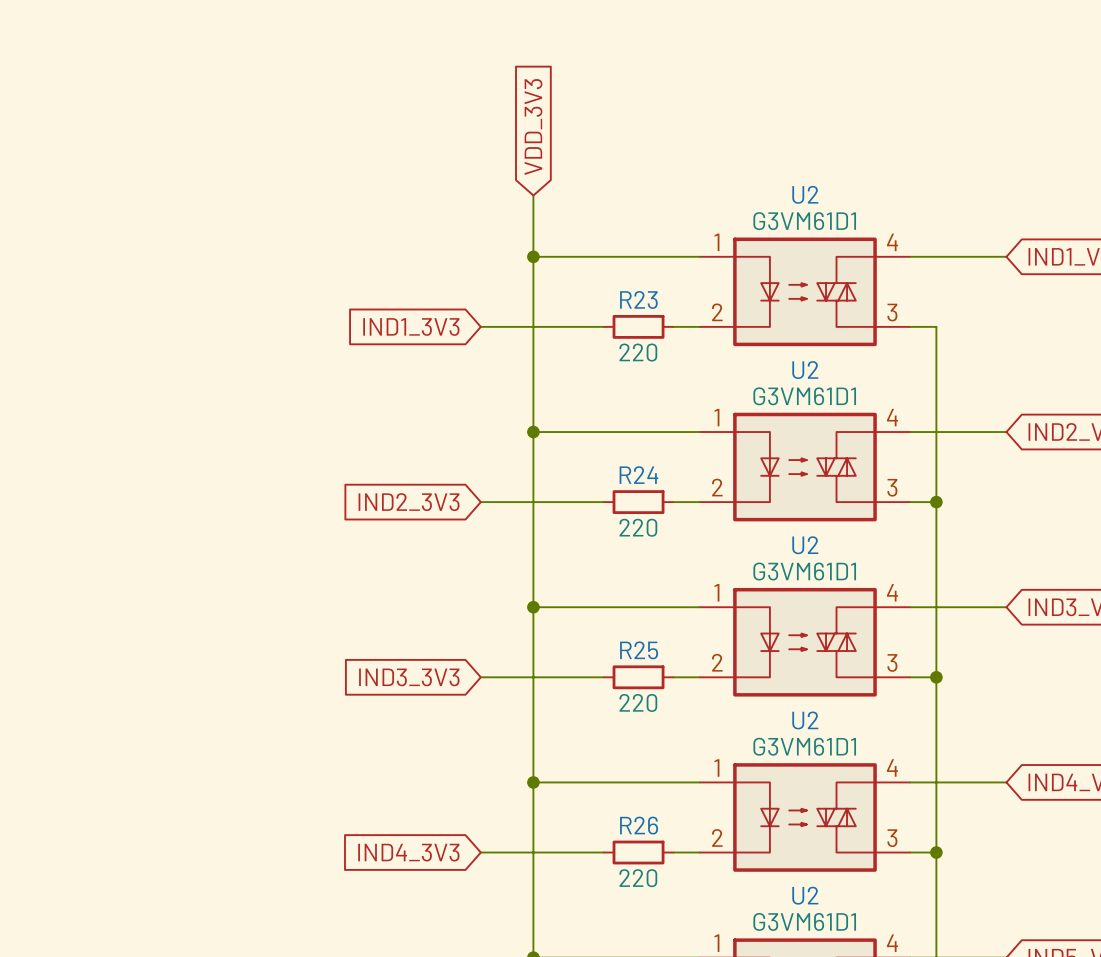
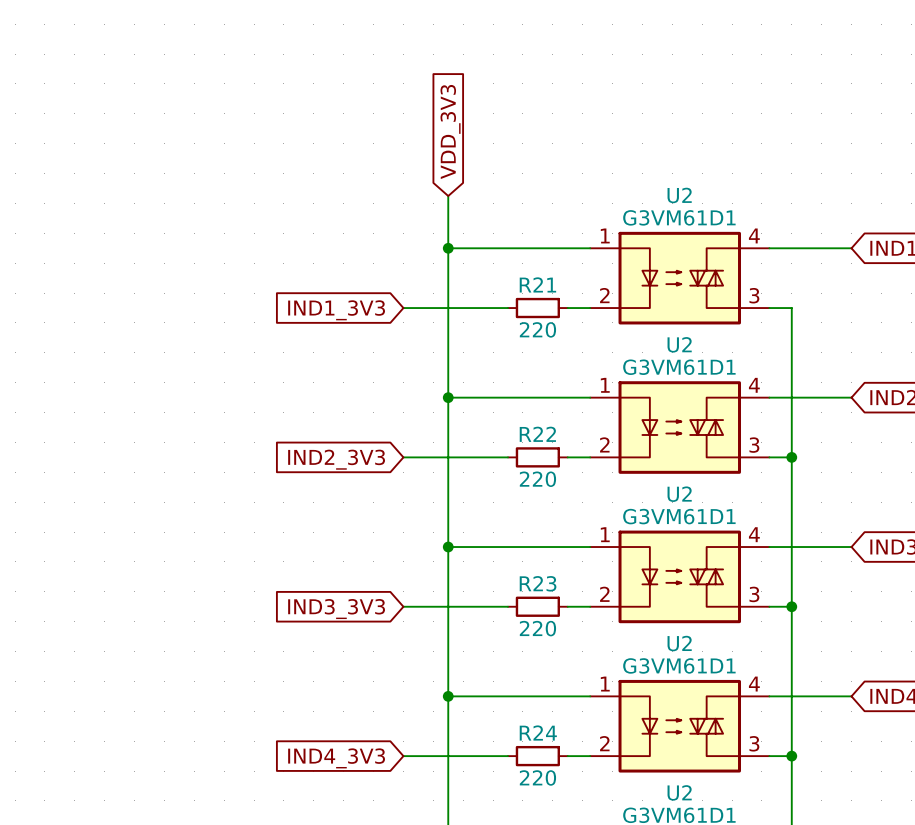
R23 name: R23 (638, 299) -> R21 (537, 284)
R24 name: R24 (638, 475) -> R22 (537, 434)
R25 name: R25 (639, 650) -> R23 (538, 583)
R26 name: R26 (639, 825) -> R24 (538, 733)

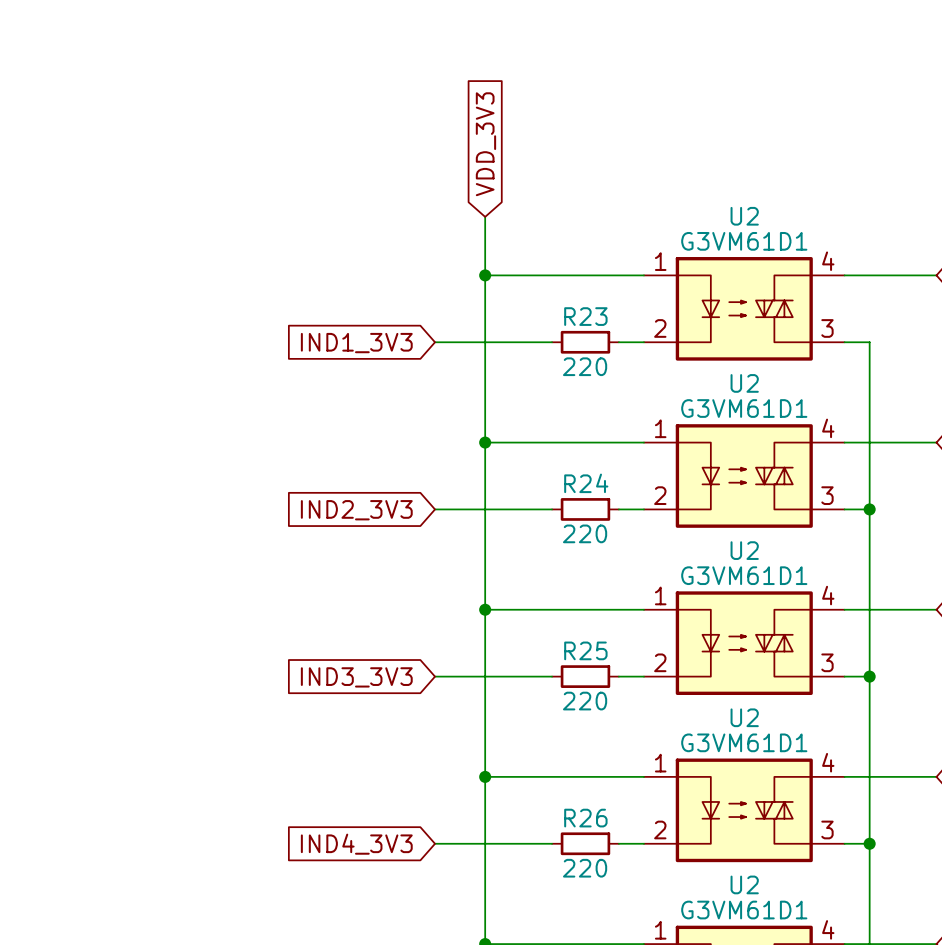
R21 name: R21 (537, 284) -> R23 (585, 316)
R22 name: R22 (537, 434) -> R24 (586, 483)
R23 name: R23 (538, 583) -> R25 (585, 650)
R24 name: R24 (538, 733) -> R26 (585, 818)

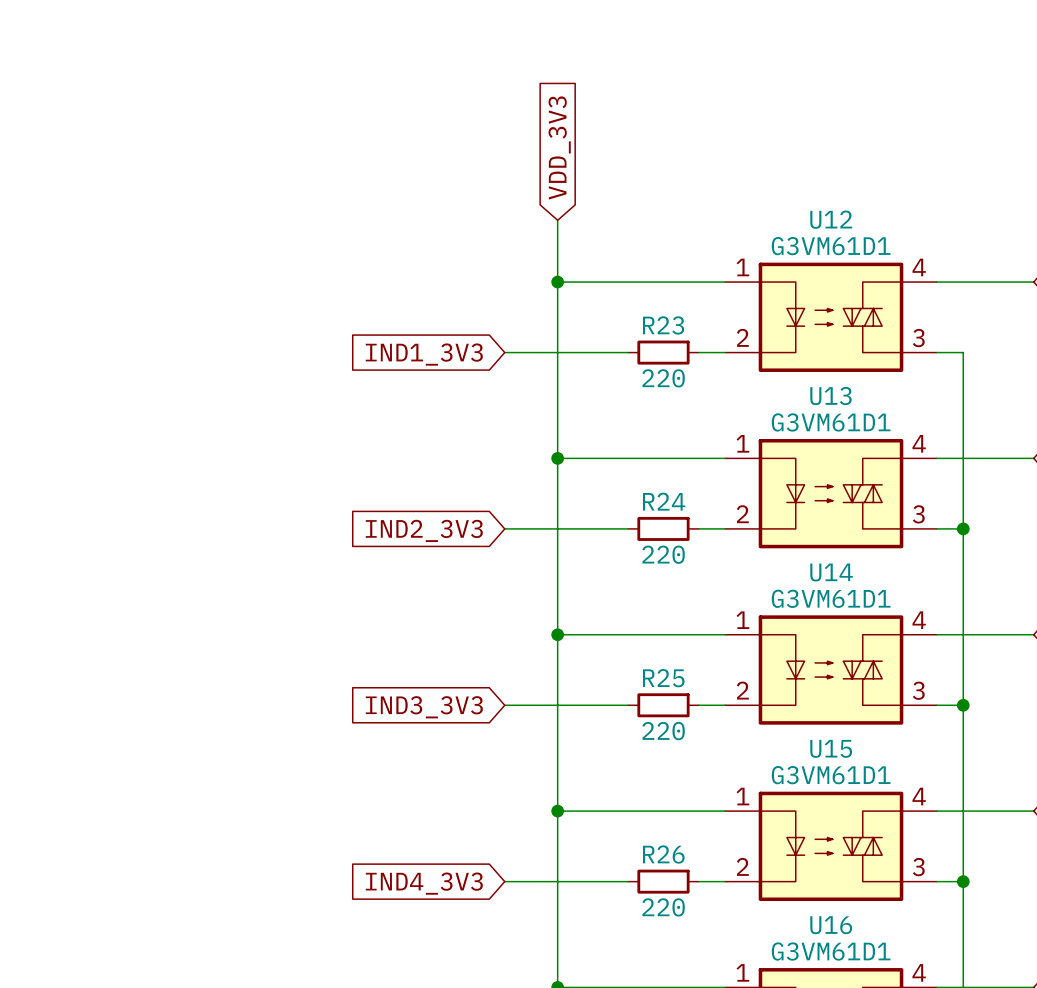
U2 name: U2 (744, 216) -> U12 (831, 219)
U2 name: U2 (744, 383) -> U13 (830, 396)
U2 name: U2 (744, 550) -> U14 (831, 572)
U2 name: U2 (744, 717) -> U15 (831, 748)
U2 name: U2 (744, 884) -> U16 (831, 925)

